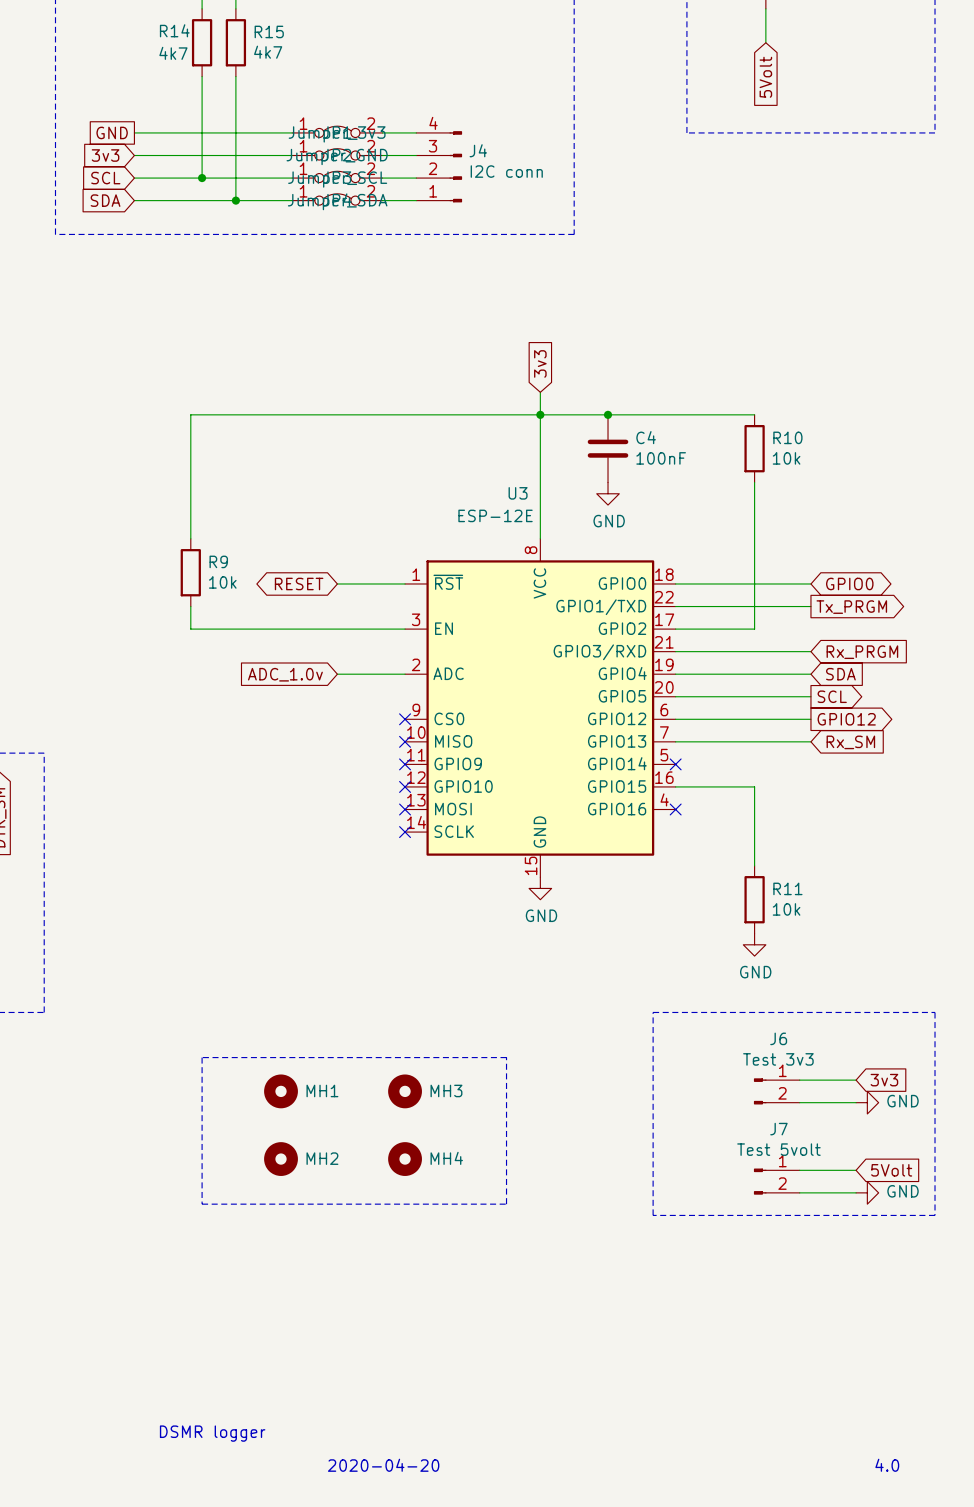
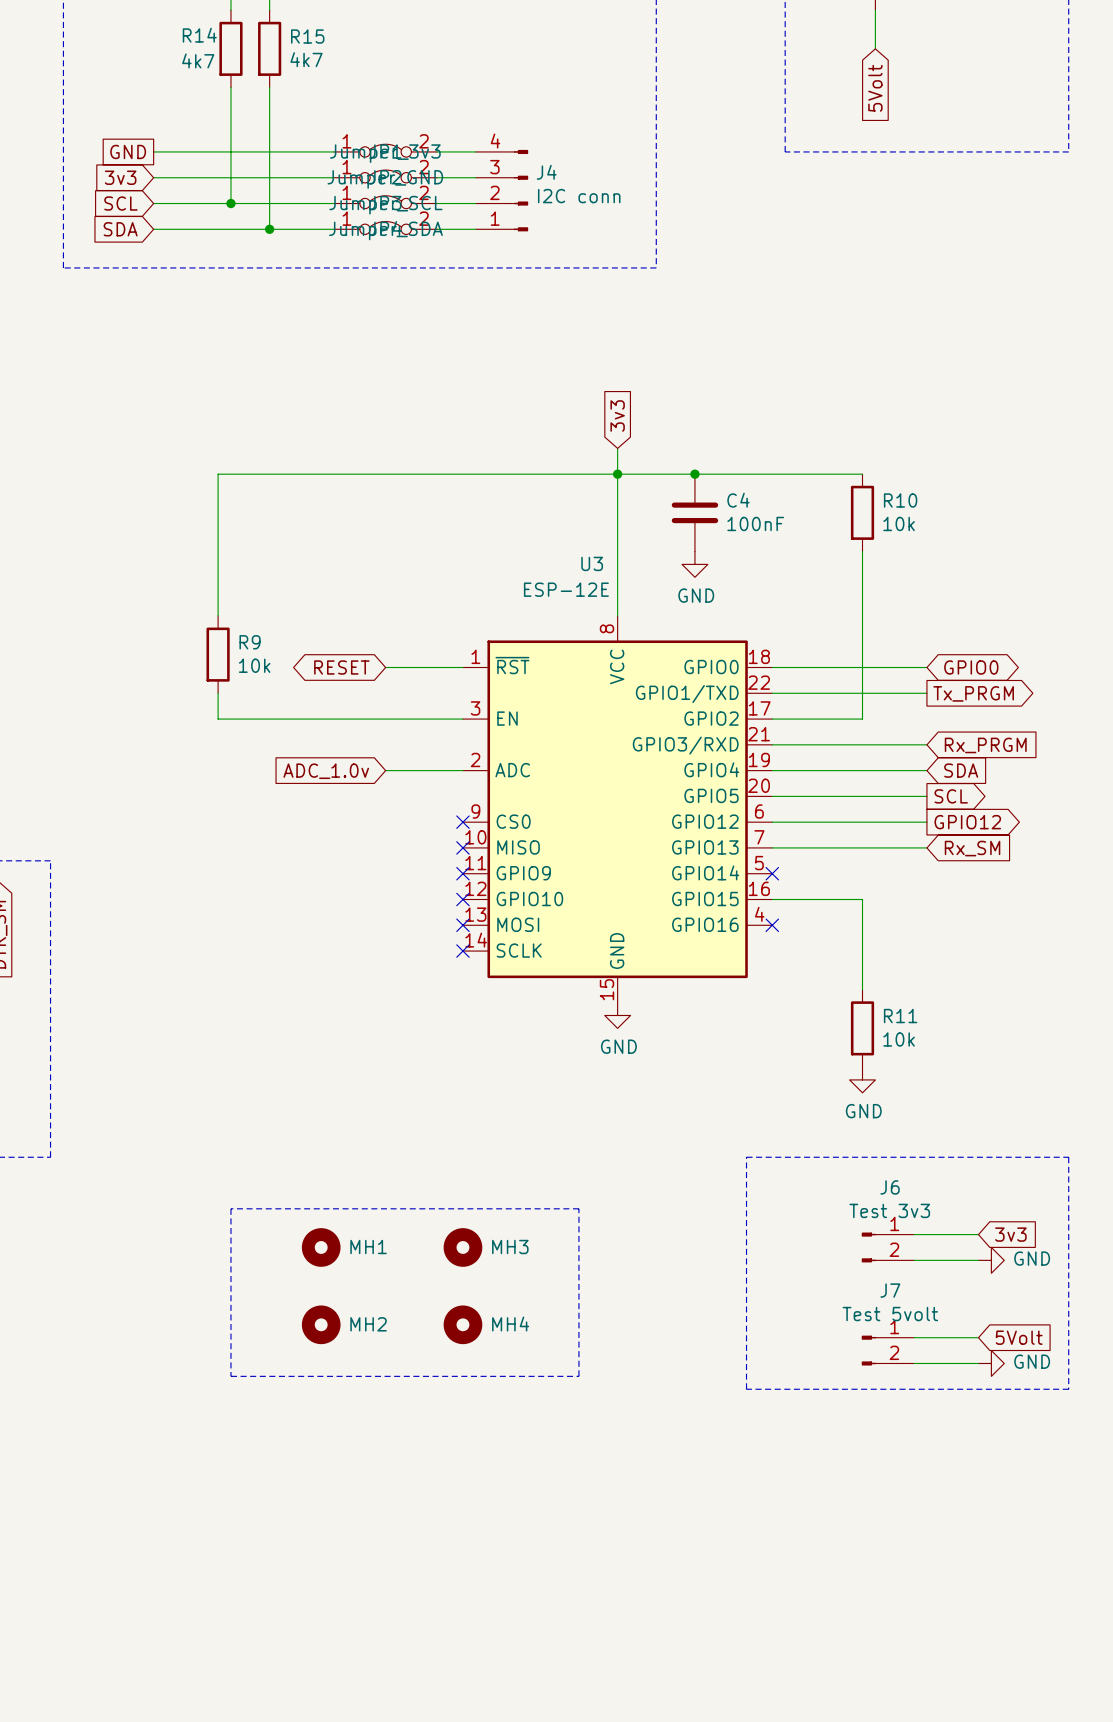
text: DSMR logger (212, 1433) -> none
text: 2020-04-20 (383, 1465) -> none
text: 4.0 (887, 1465) -> none

